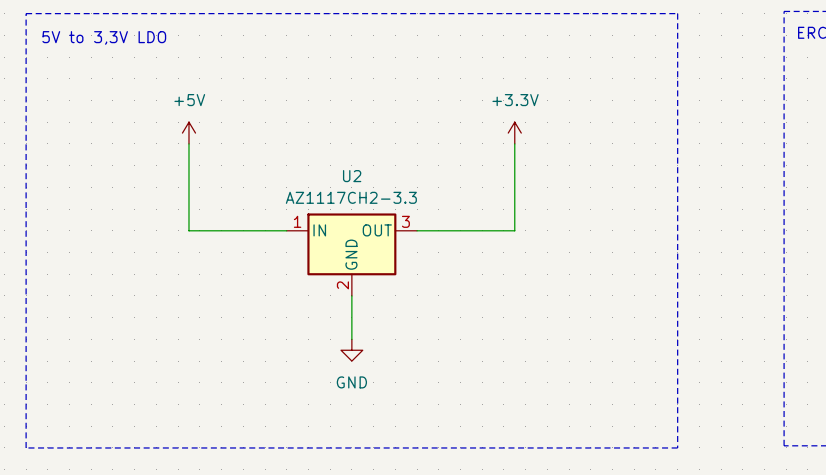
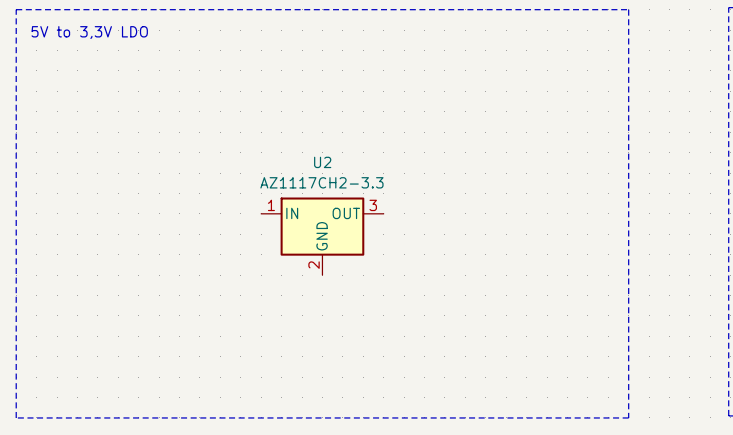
power symbol: +5V (188, 133) -> none
power symbol: +3.3V (514, 133) -> none
wire: (188, 143) (188, 230) (286, 230) -> none
wire: (514, 143) (514, 230) (417, 230) -> none
wire: (351, 295) (351, 339) -> none
power symbol: GND (351, 350) -> none

